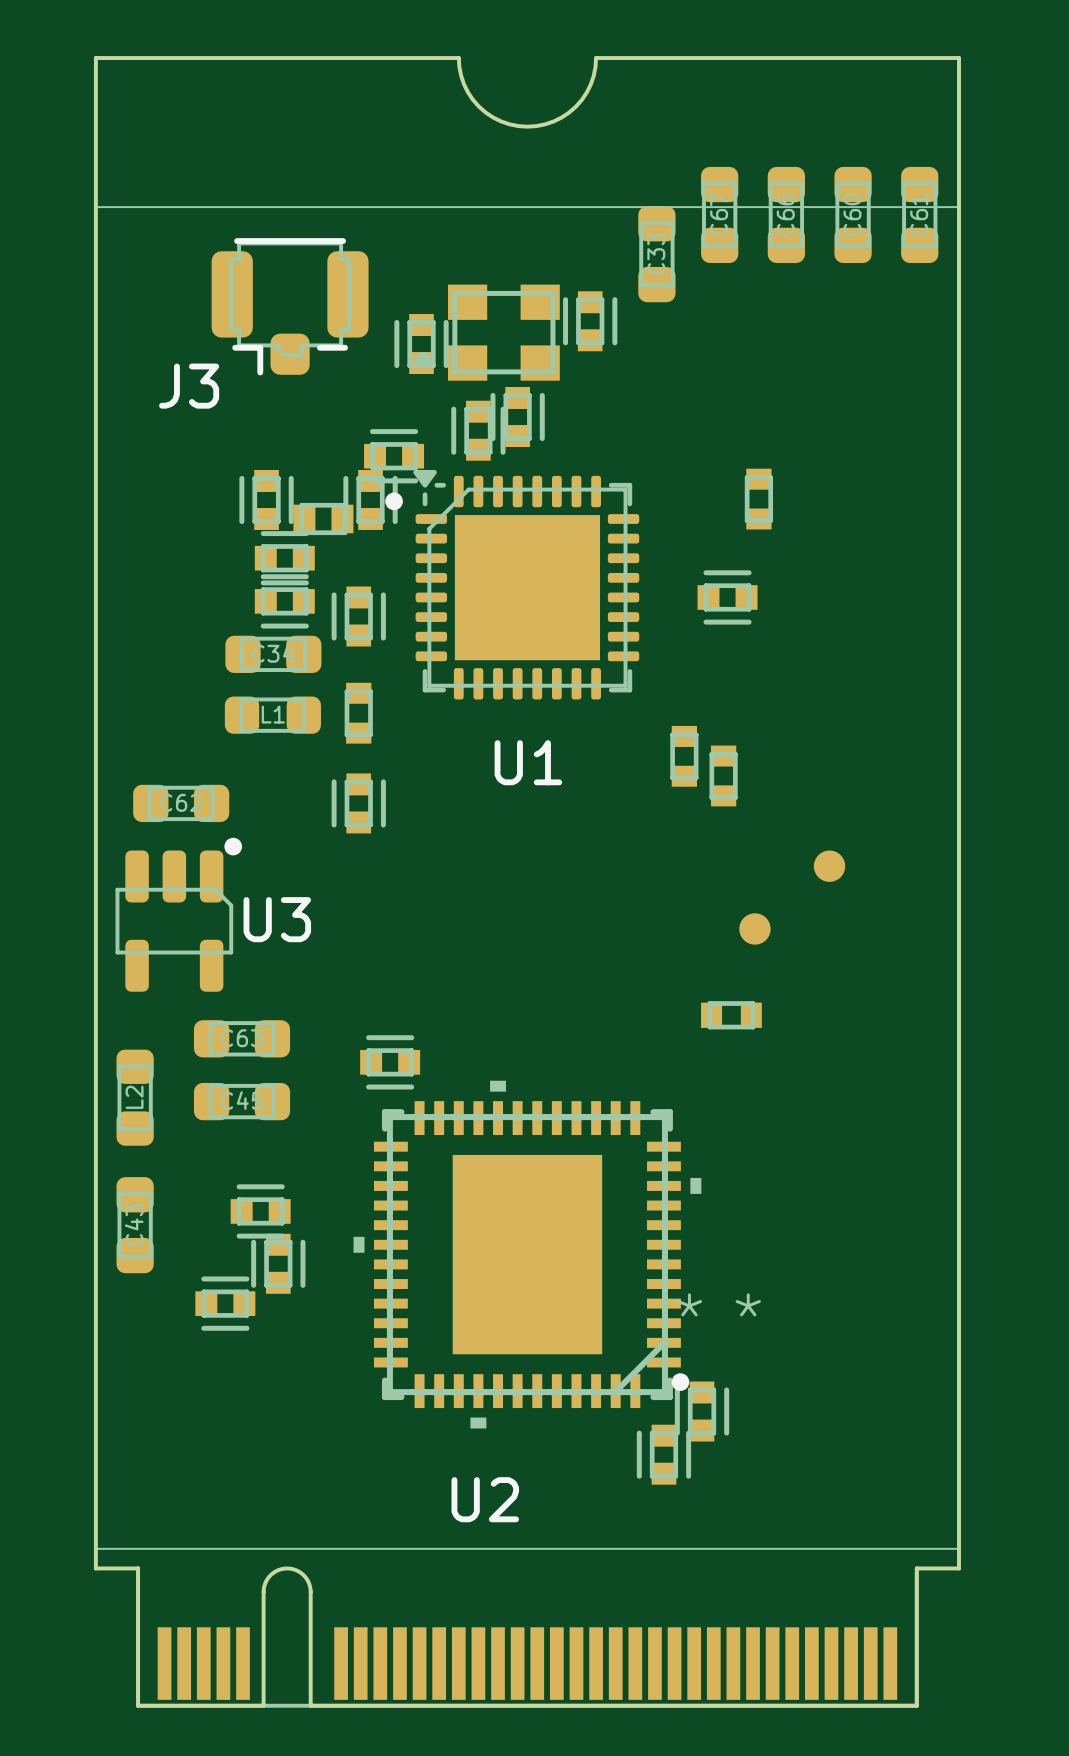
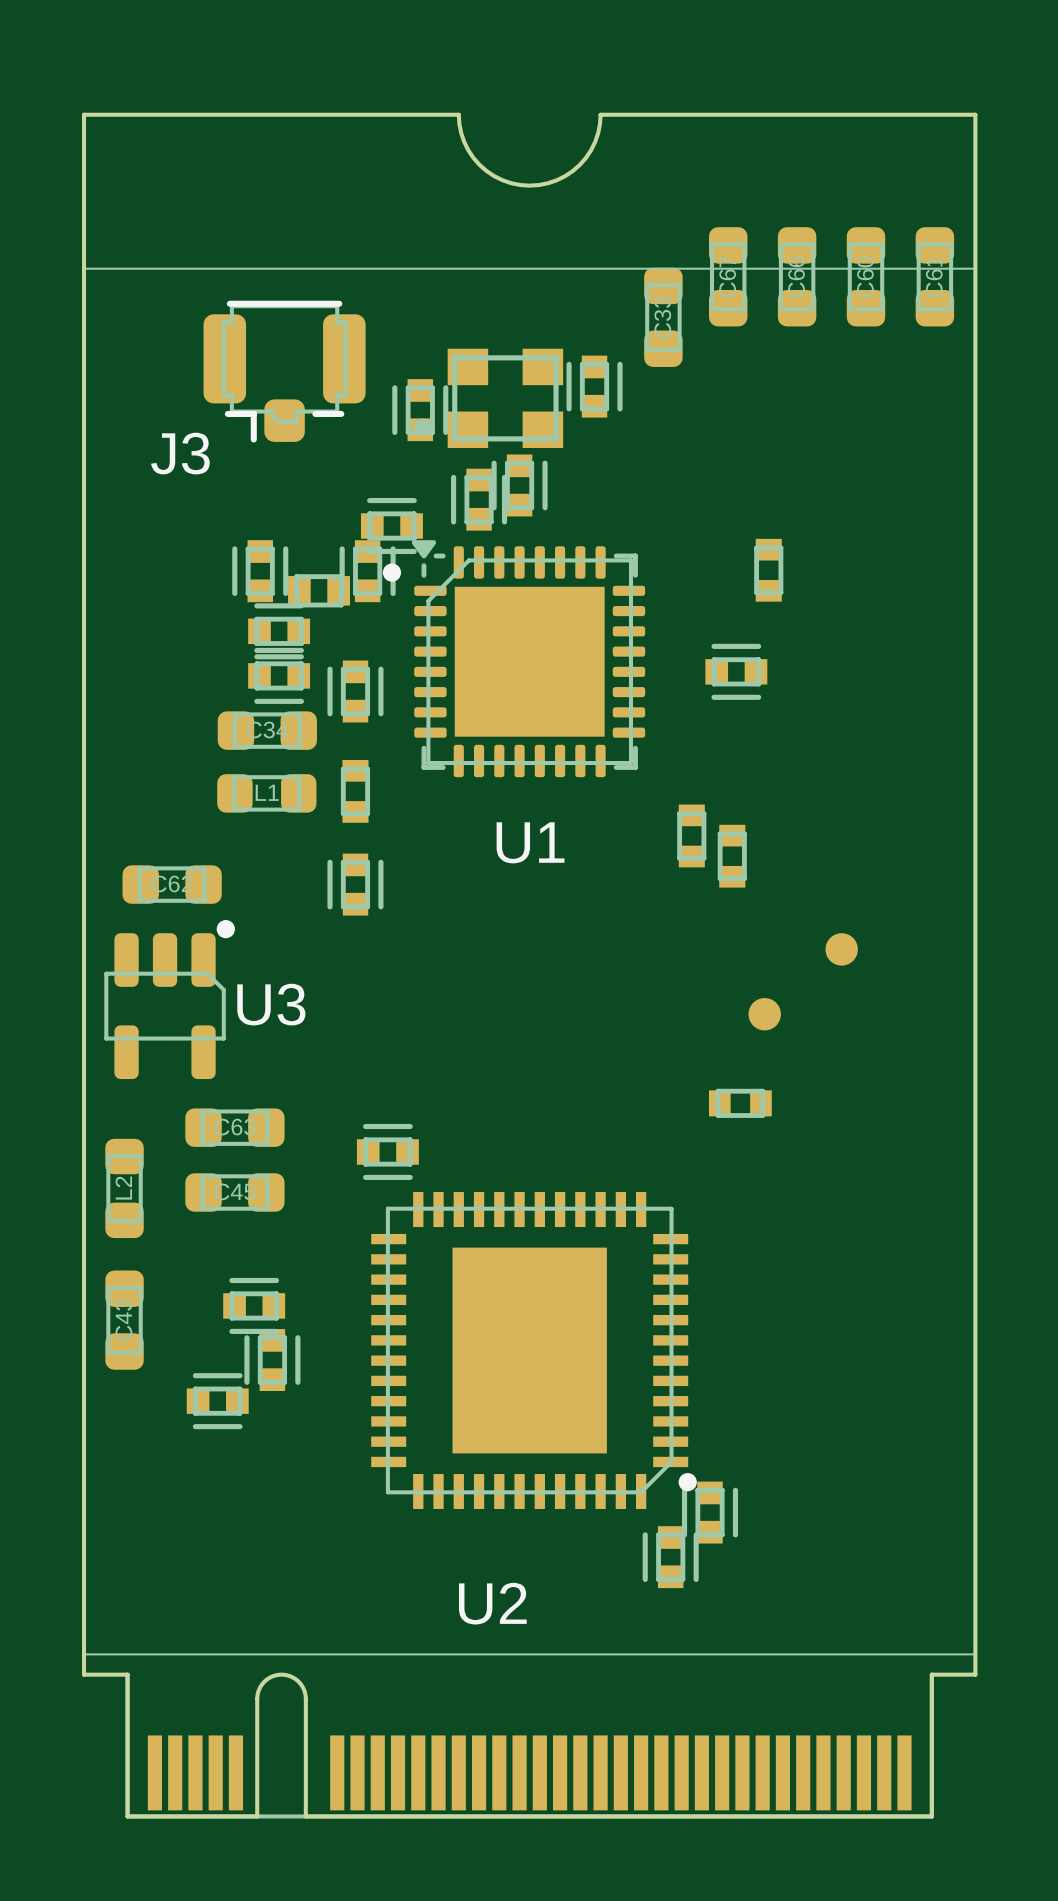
U2 footprint: [353, 1080, 702, 1429] -> [371, 1192, 697, 1510]

